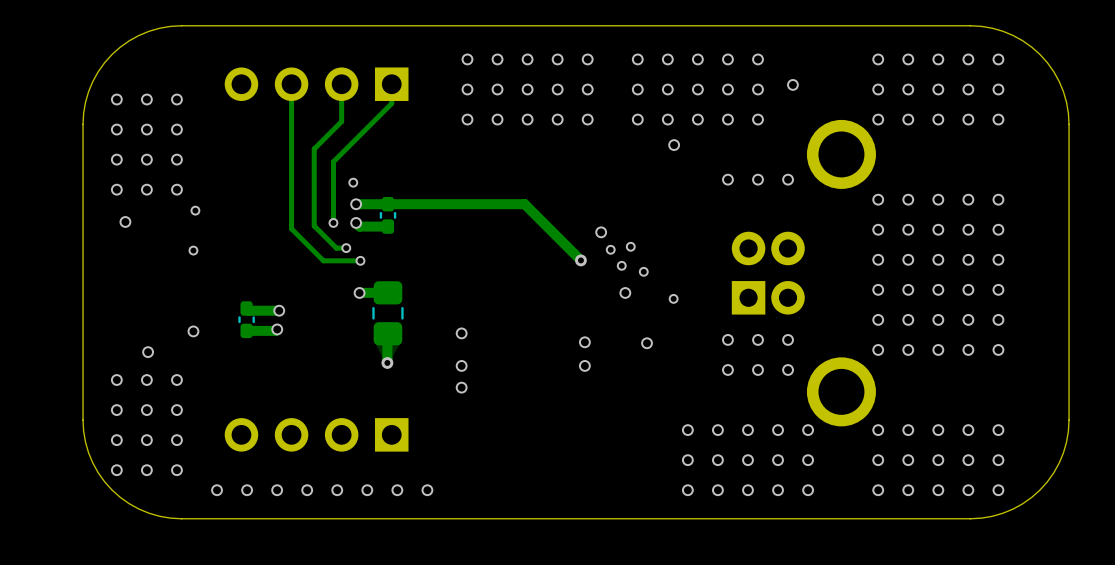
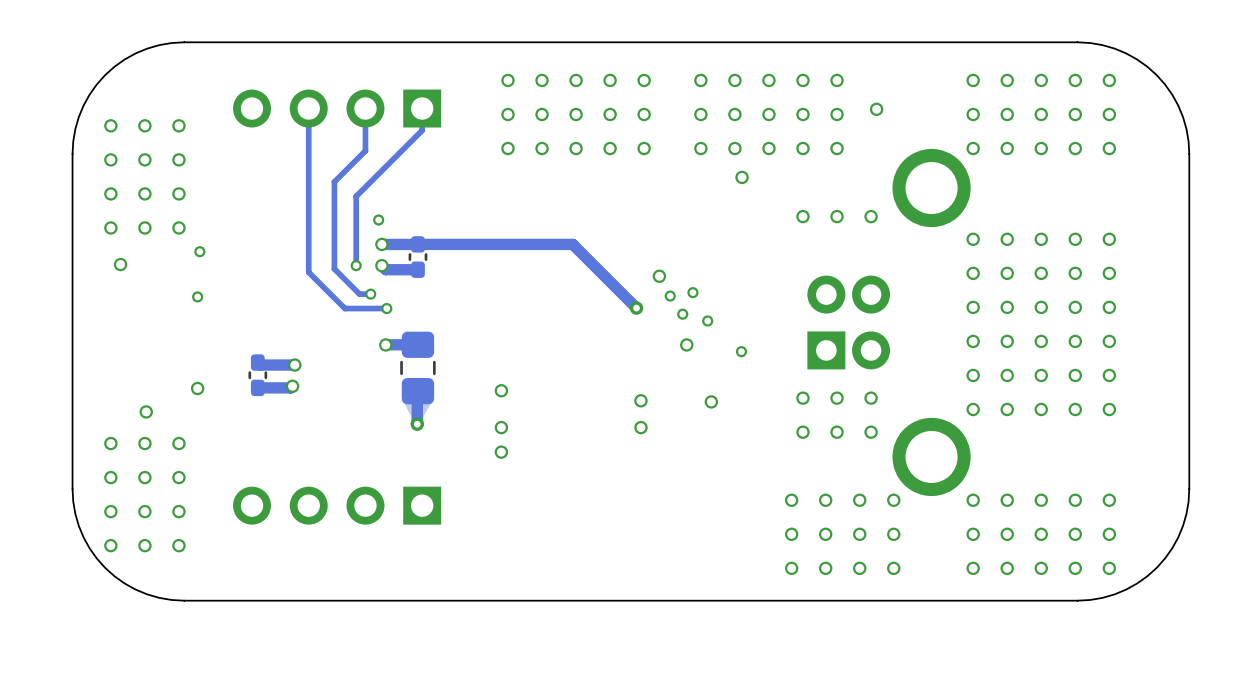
via: (687, 430) -> none
via: (687, 460) -> none
via: (217, 490) -> none
via: (247, 490) -> none
via: (277, 490) -> none
via: (307, 490) -> none
via: (337, 490) -> none
via: (367, 490) -> none
via: (397, 490) -> none
via: (427, 490) -> none
via: (687, 490) -> none

